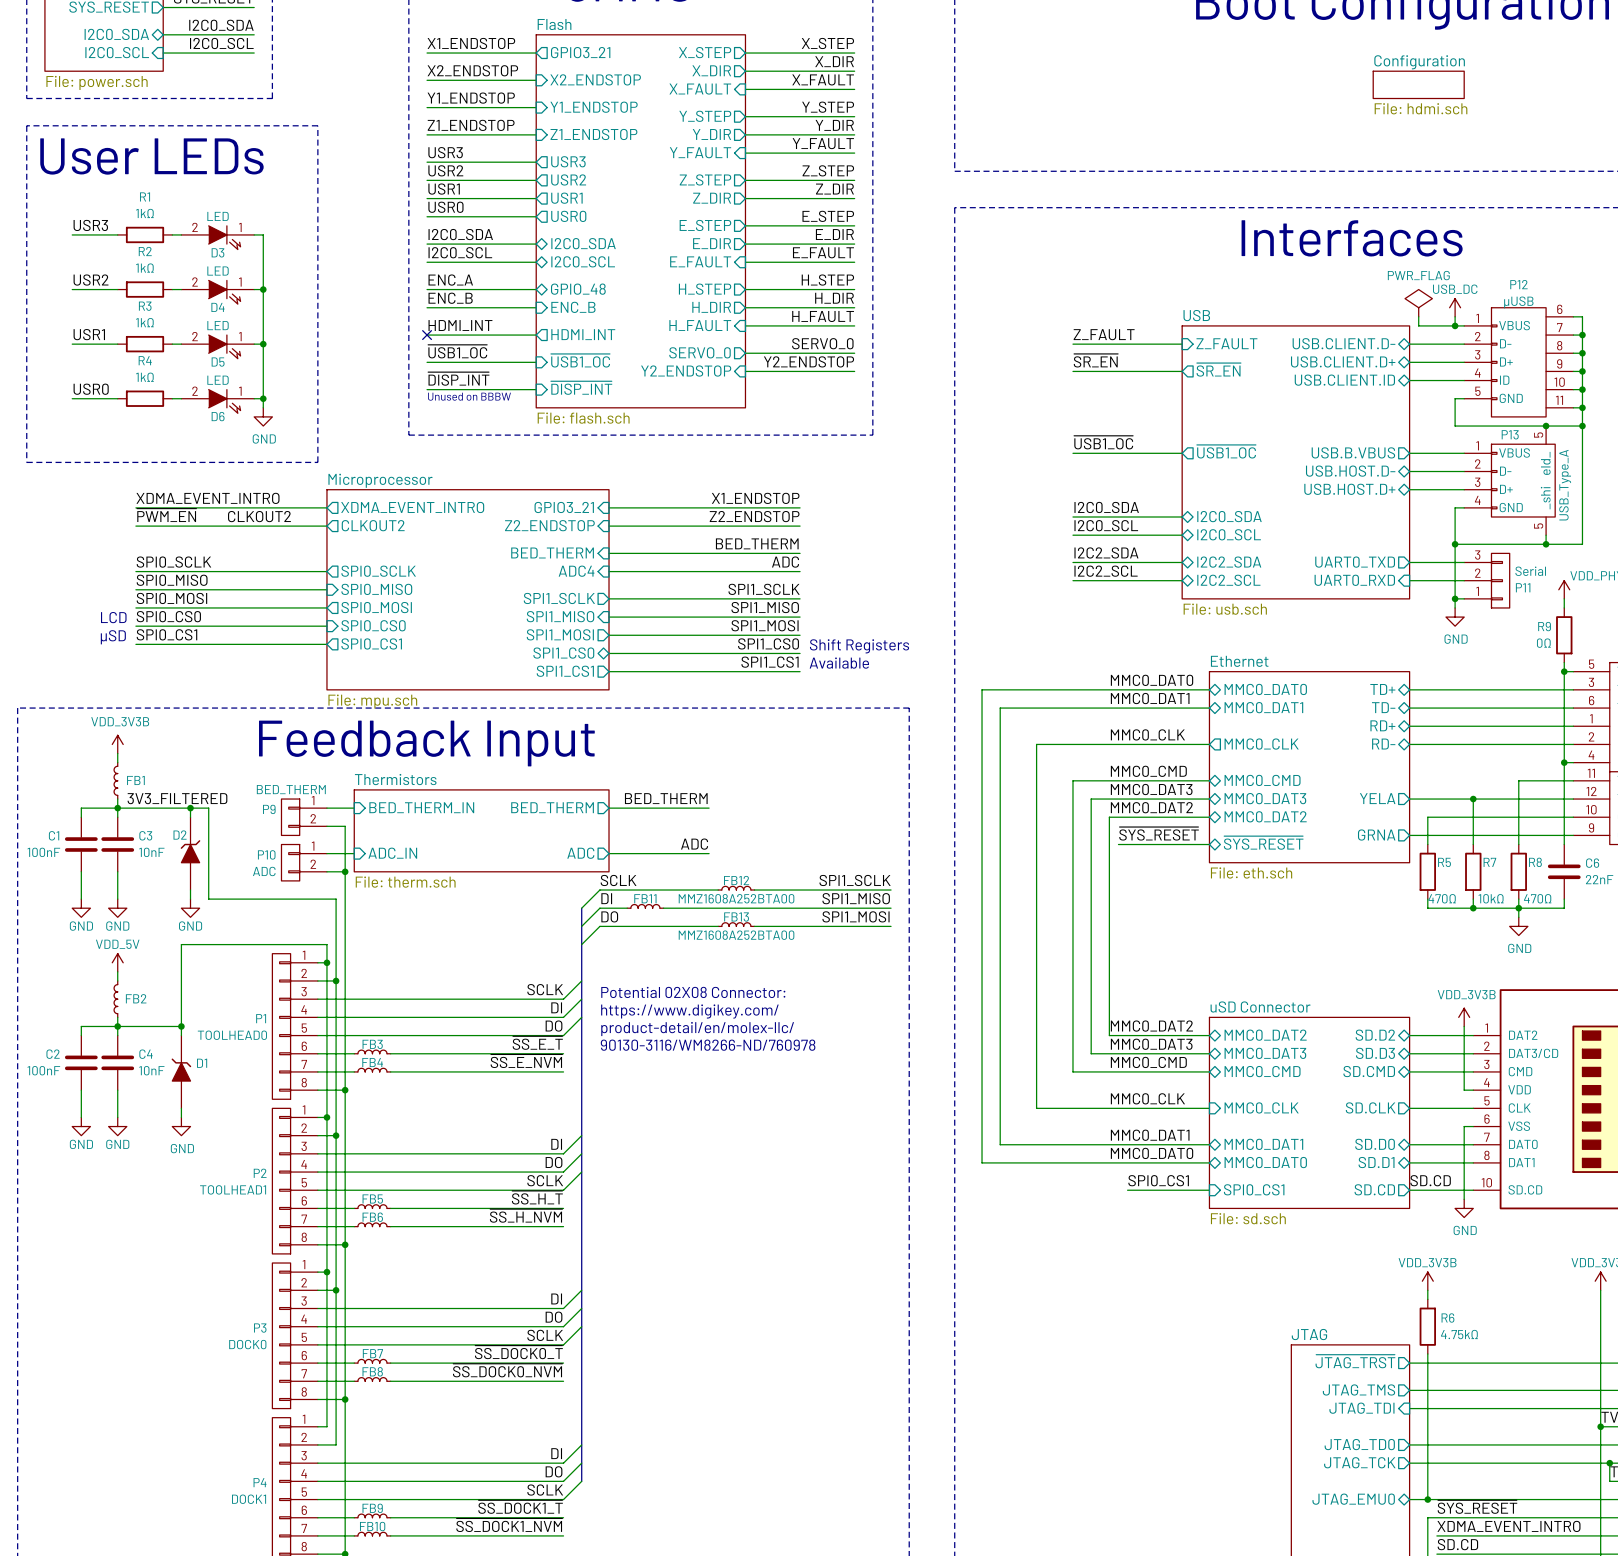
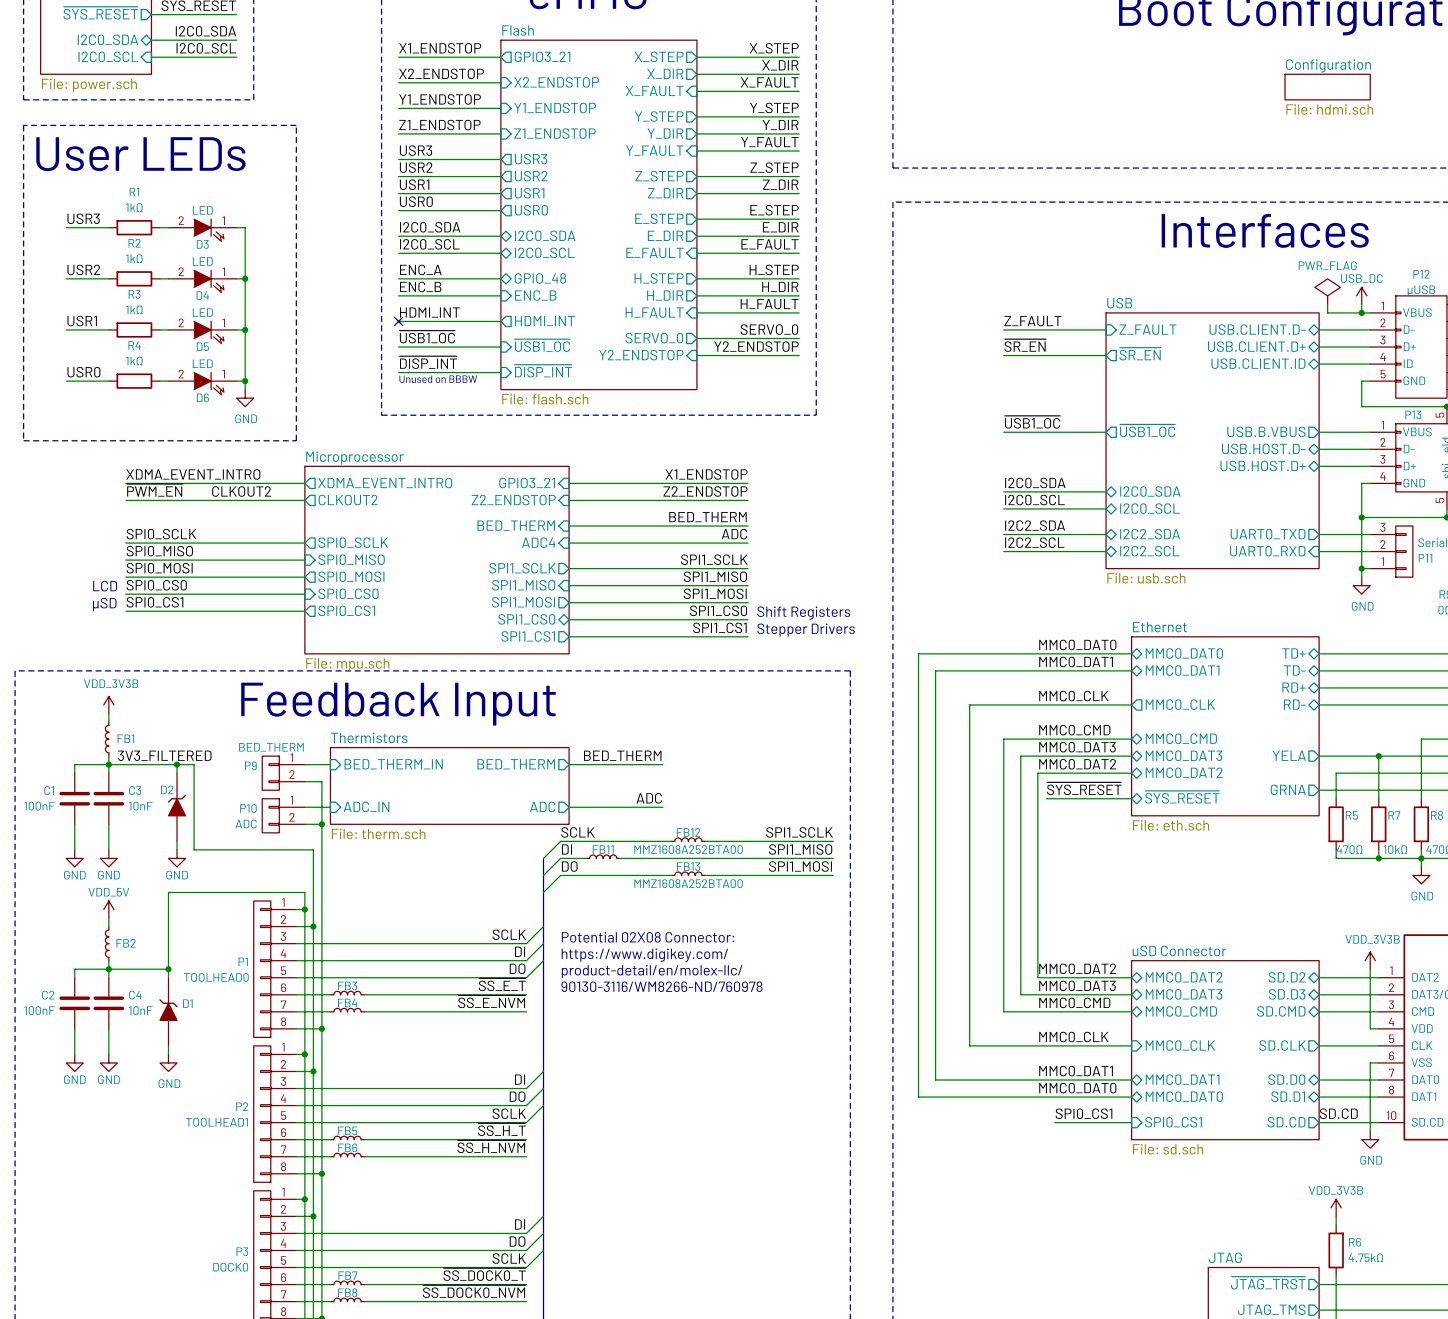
text: Available (839, 663) -> Stepper Drivers (806, 630)

